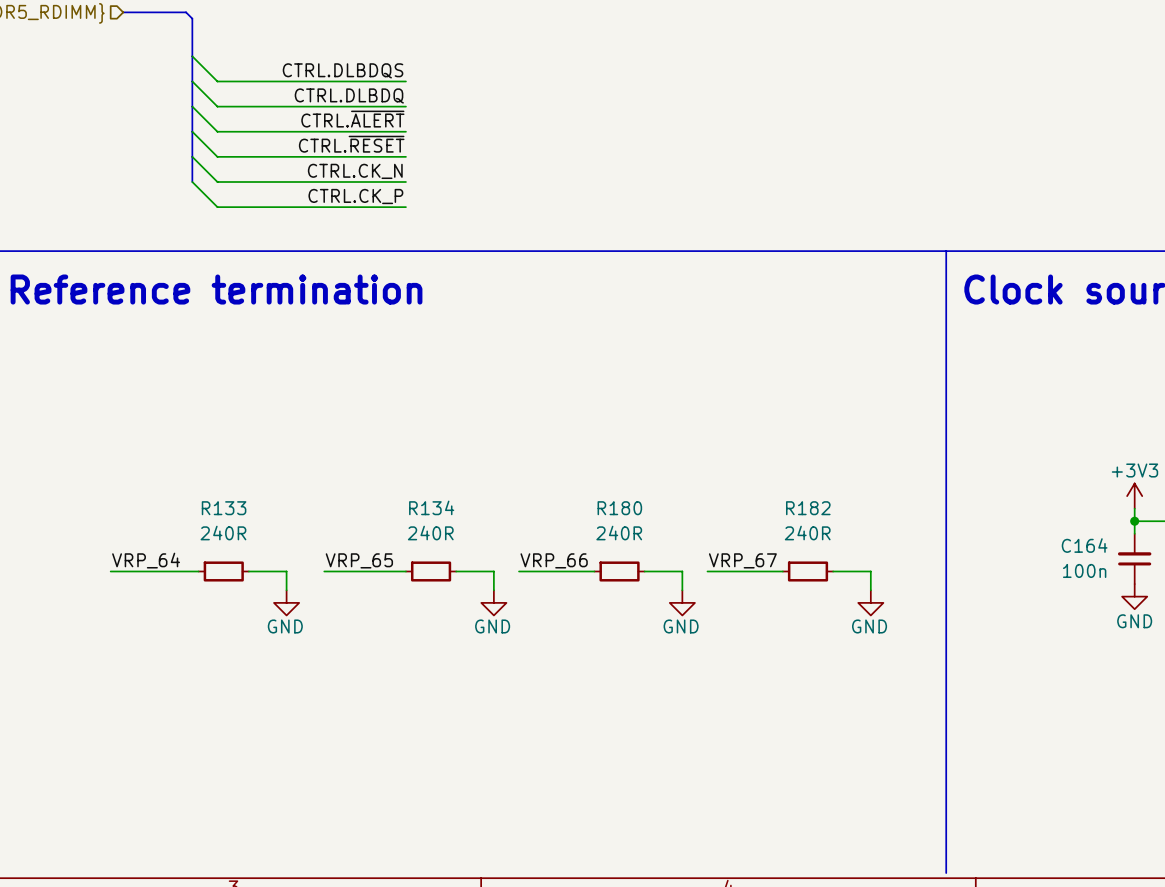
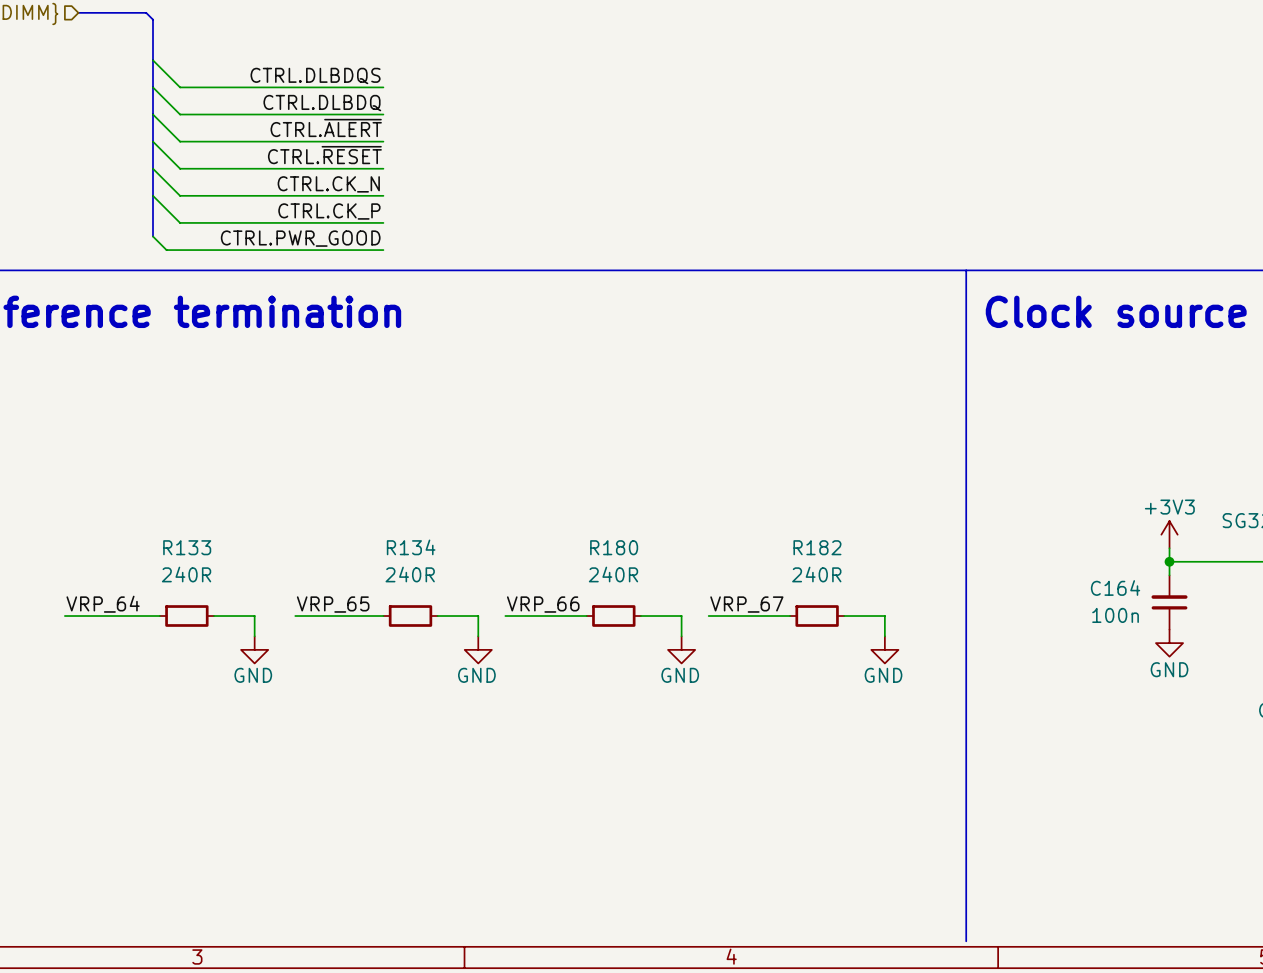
bus: none -> (153, 195) (153, 236)
wire: none -> (153, 236) (166, 250) (383, 250)
label: none -> CTRL.PWR_GOOD (300, 238)

